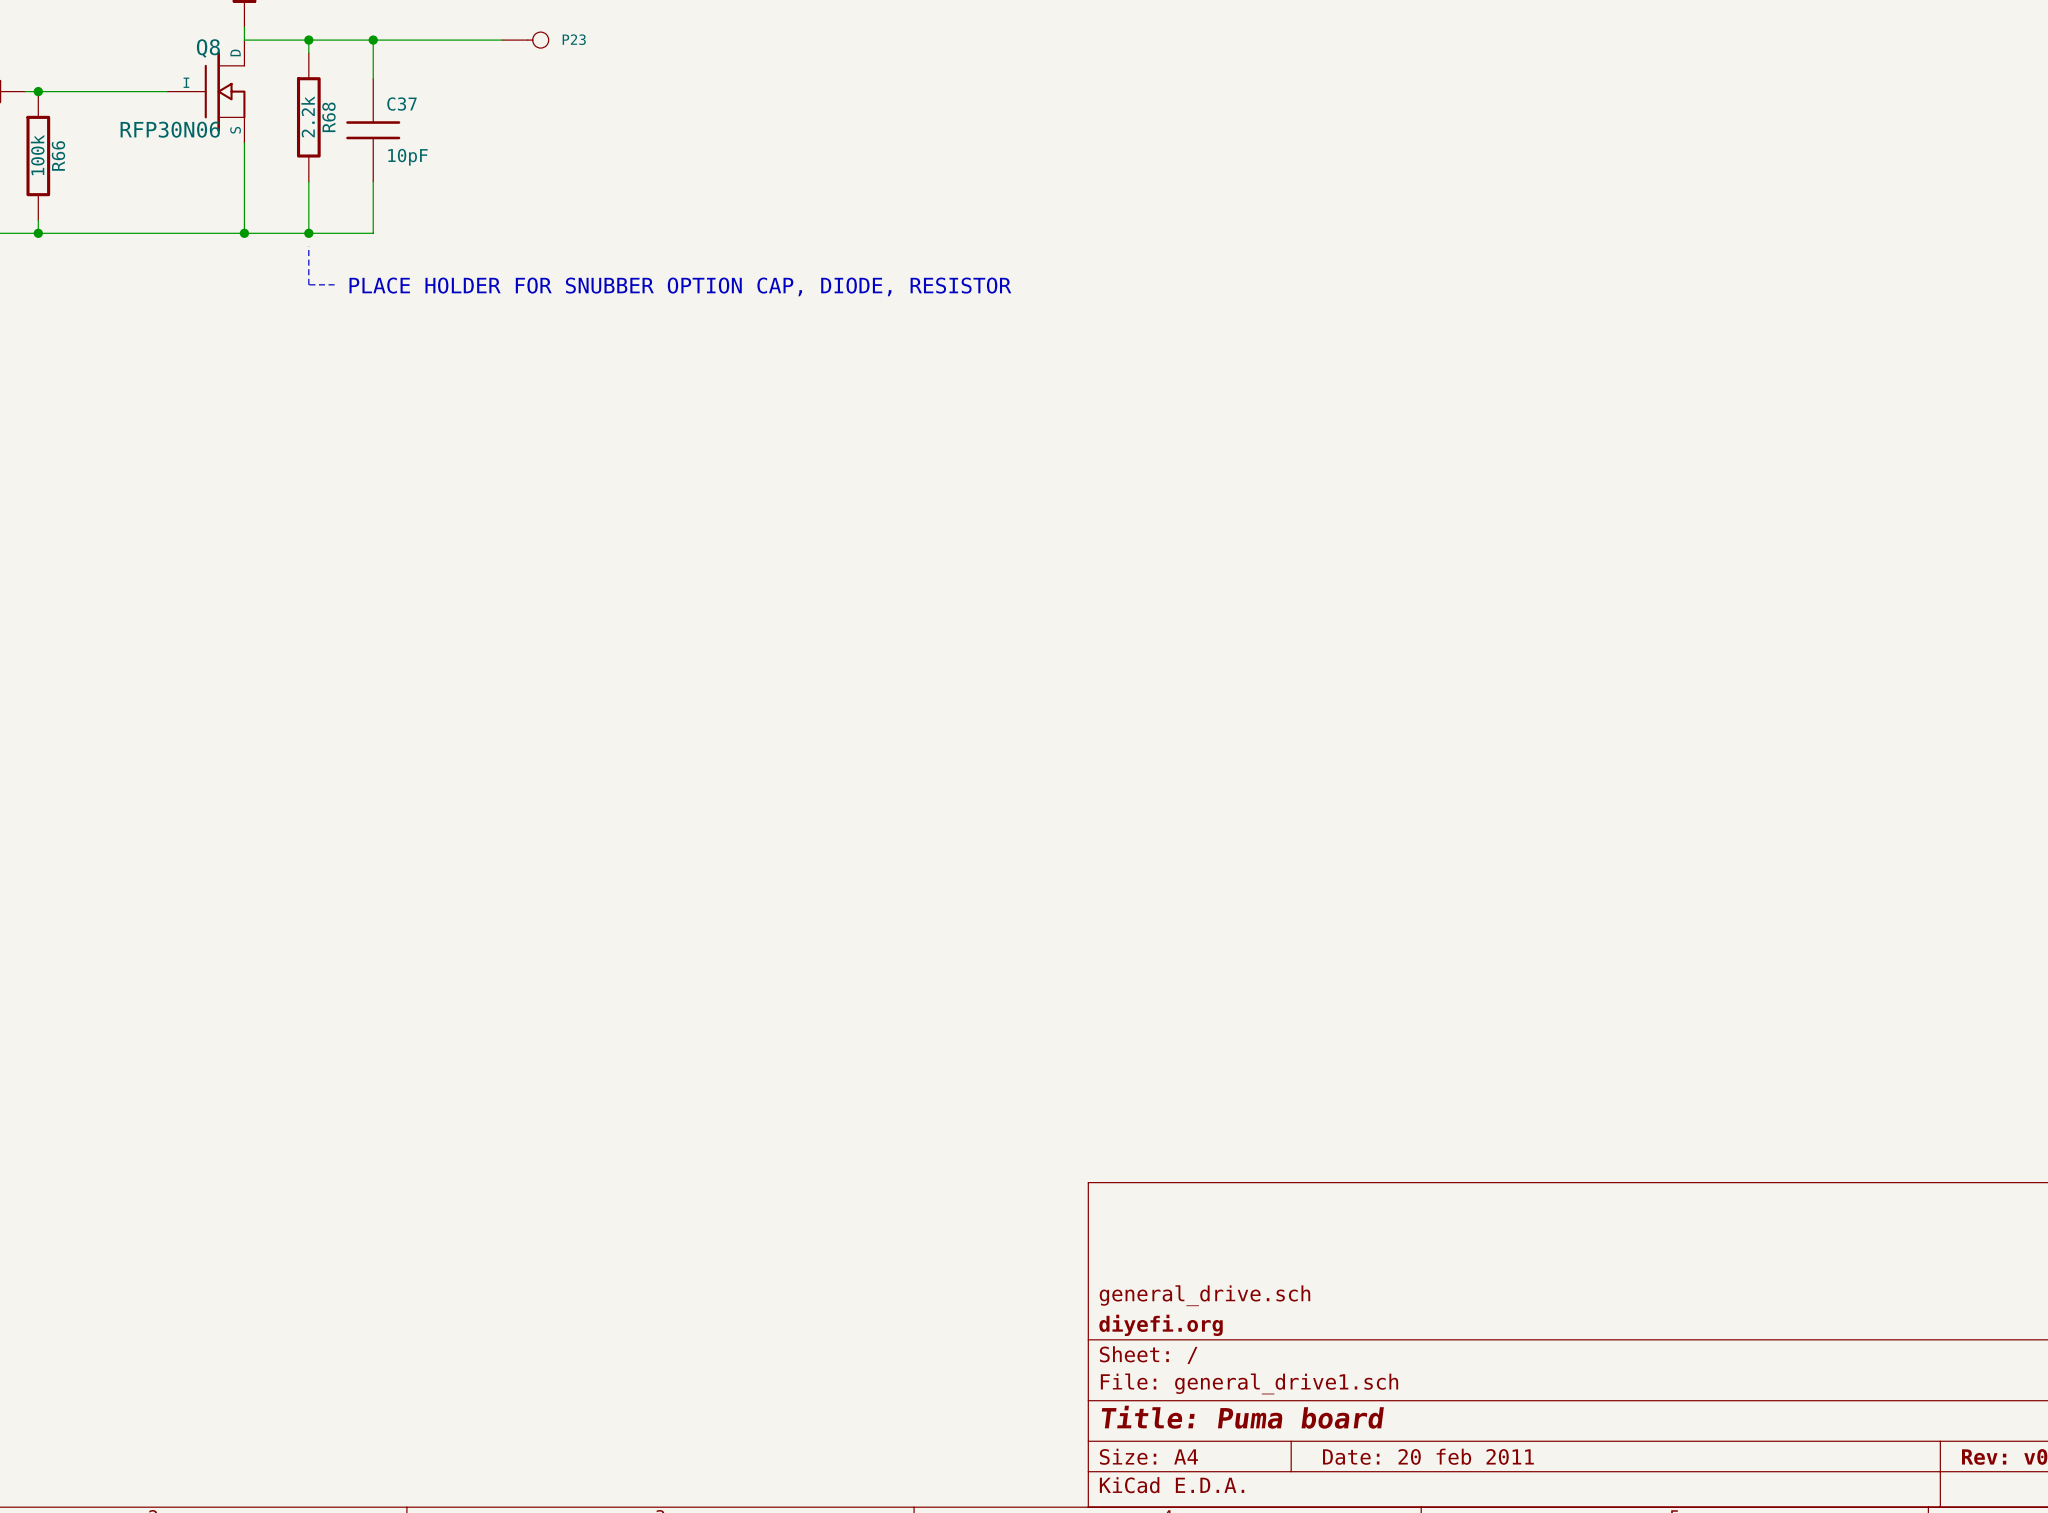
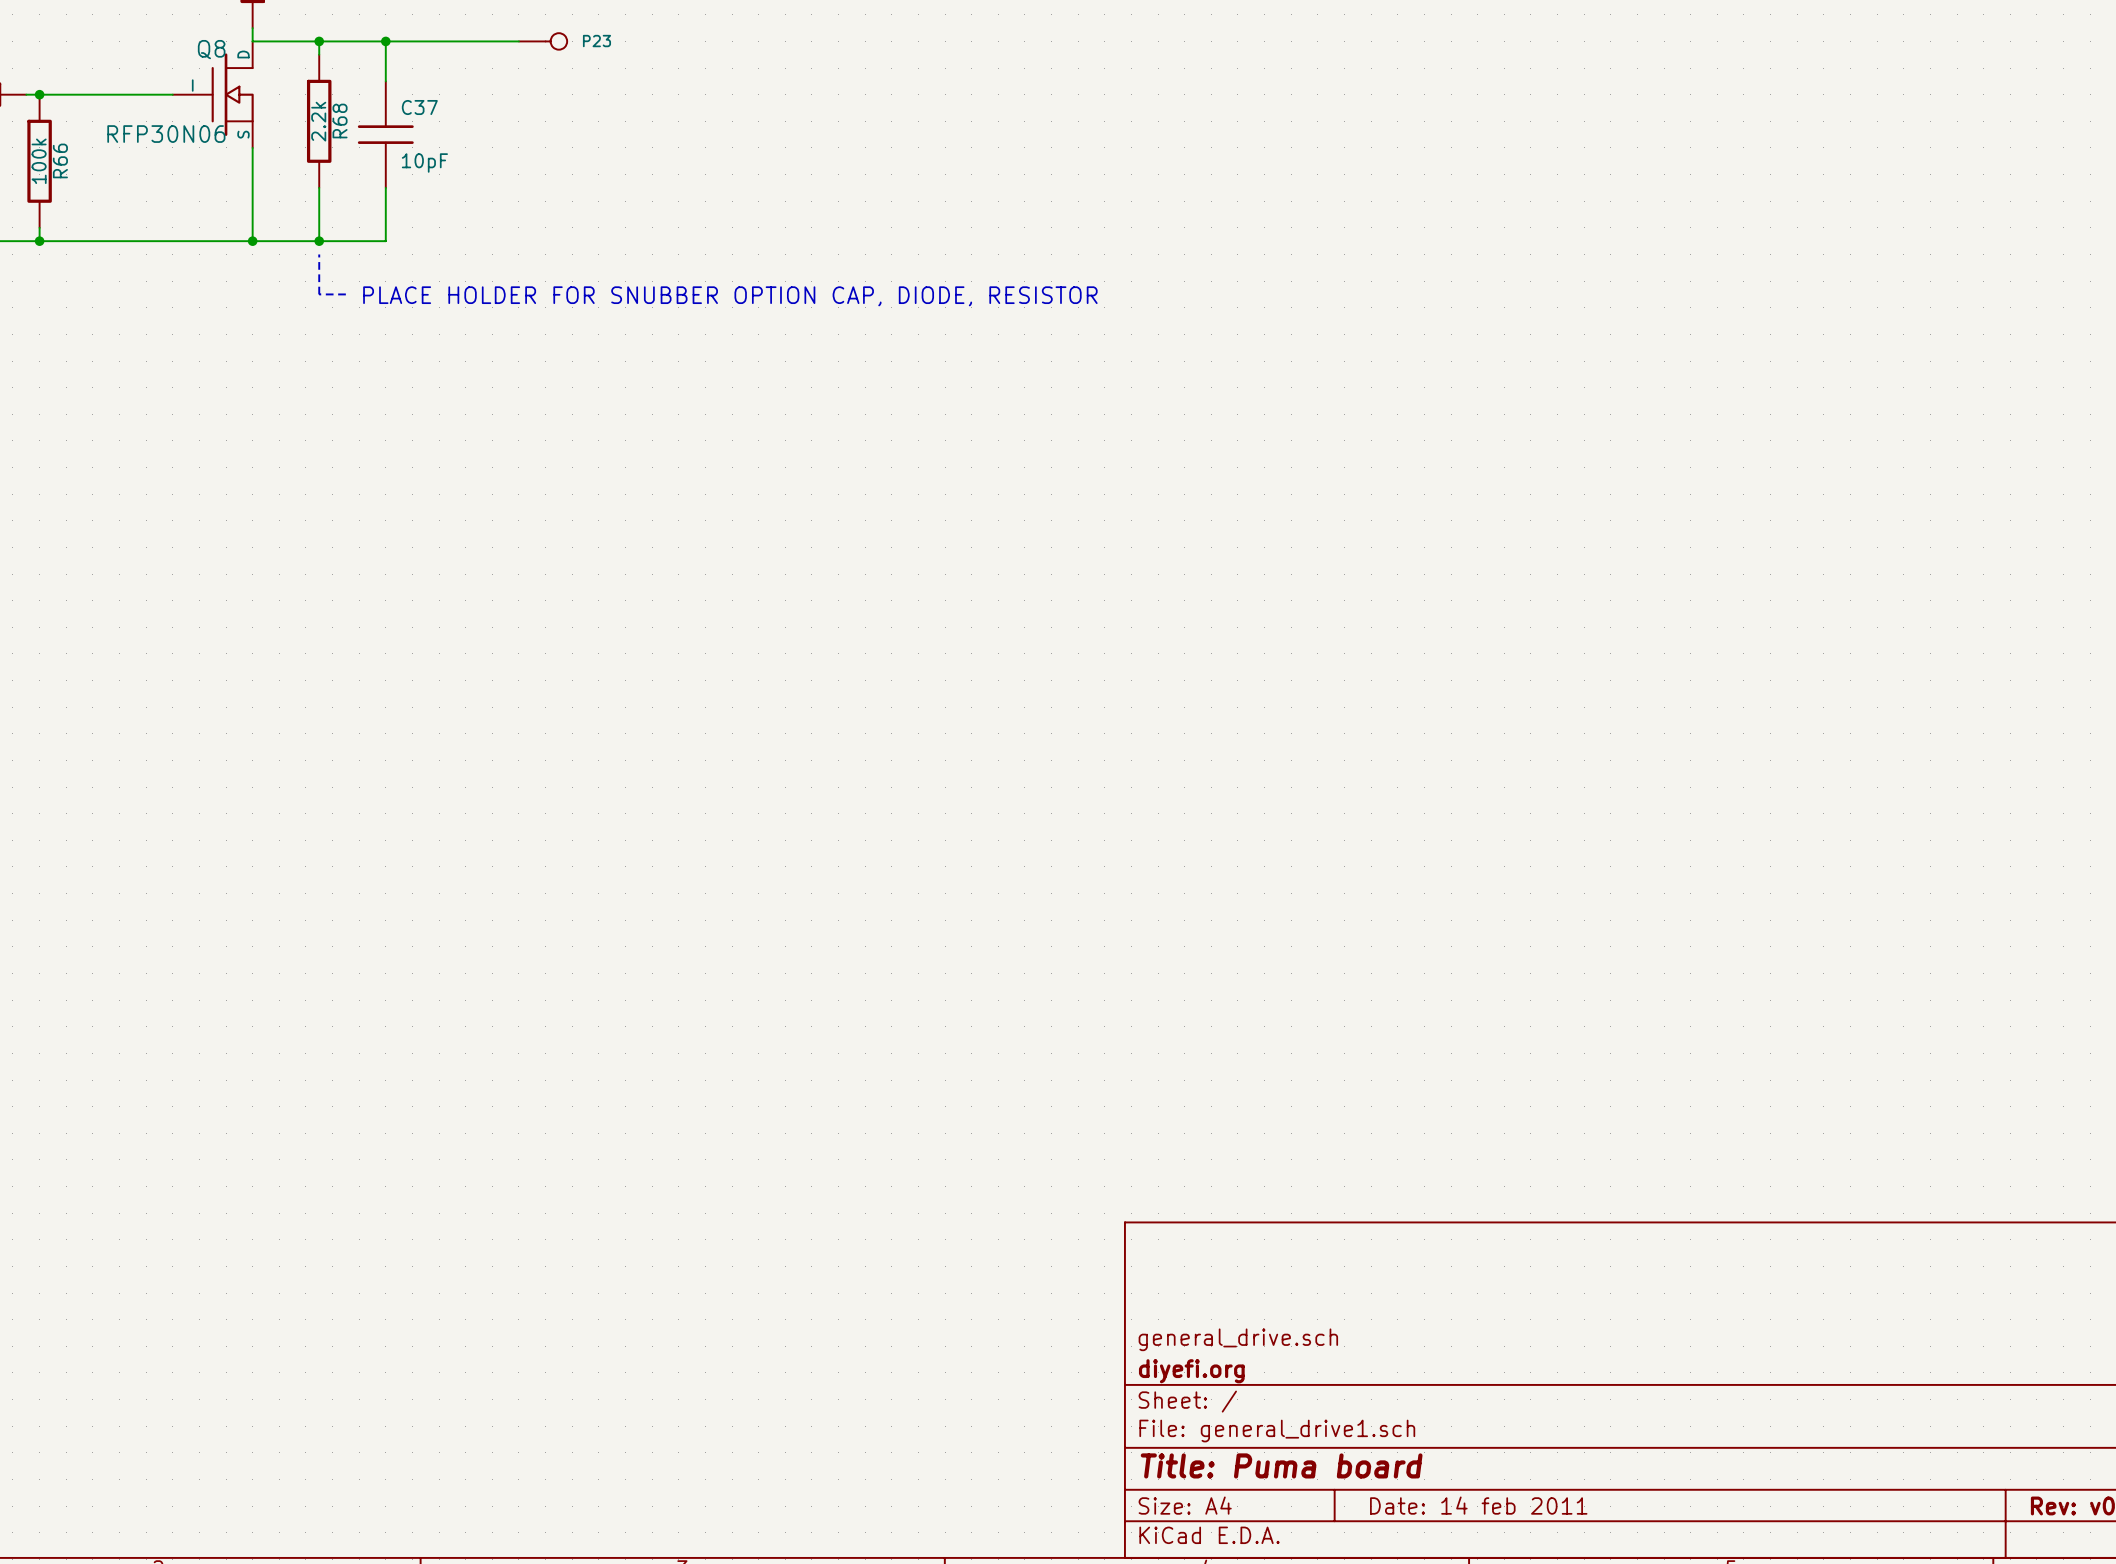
title block: Date: 20 feb 2011 (1428, 1456) -> Date: 14 feb 2011 (1478, 1505)

